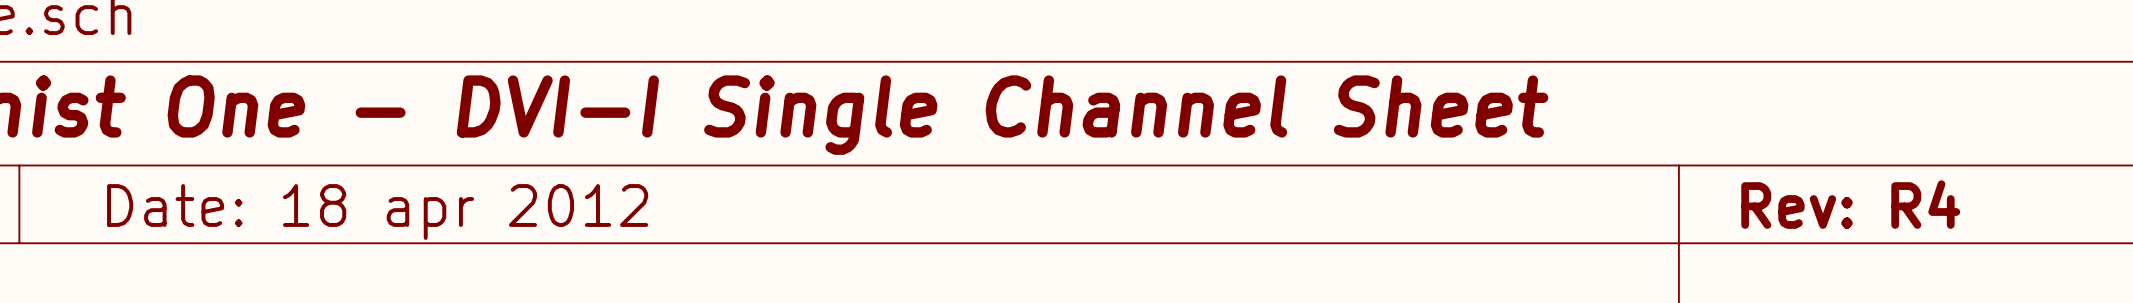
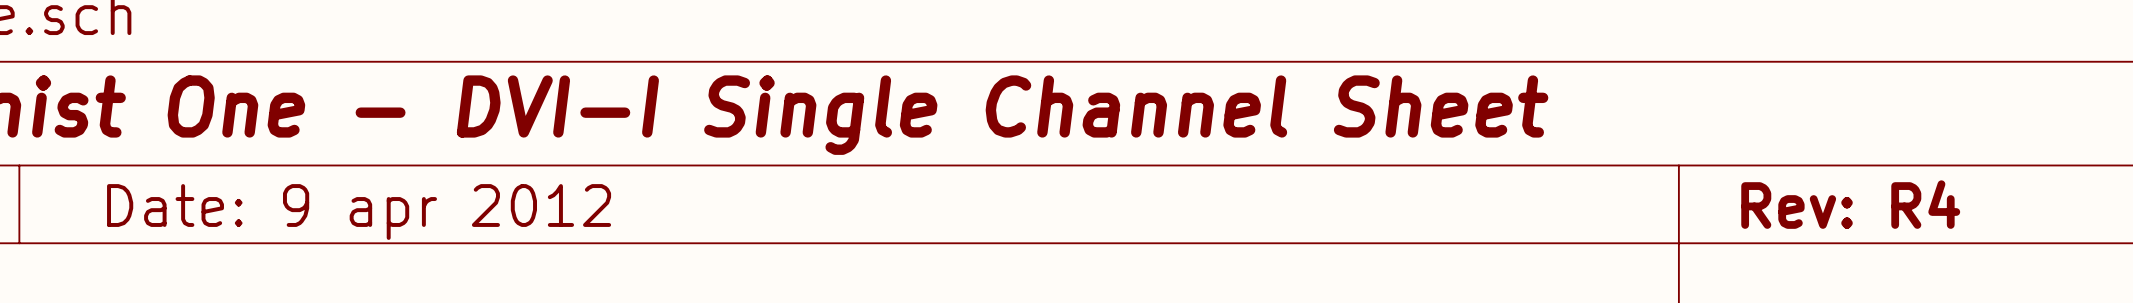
title block: Date: 18 apr 2012 (377, 211) -> Date: 9 apr 2012 (359, 211)

